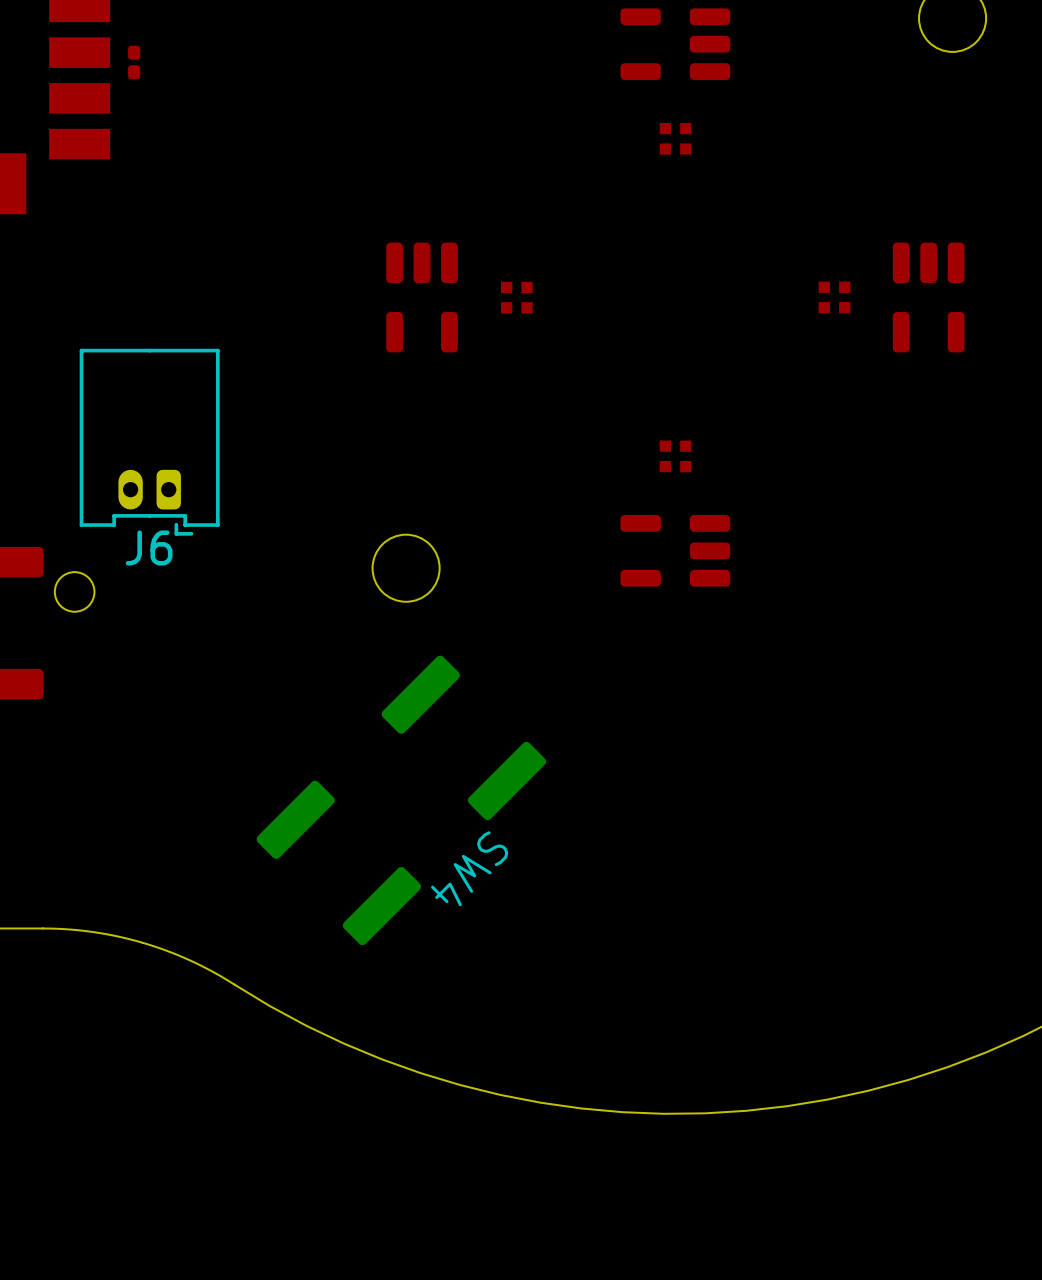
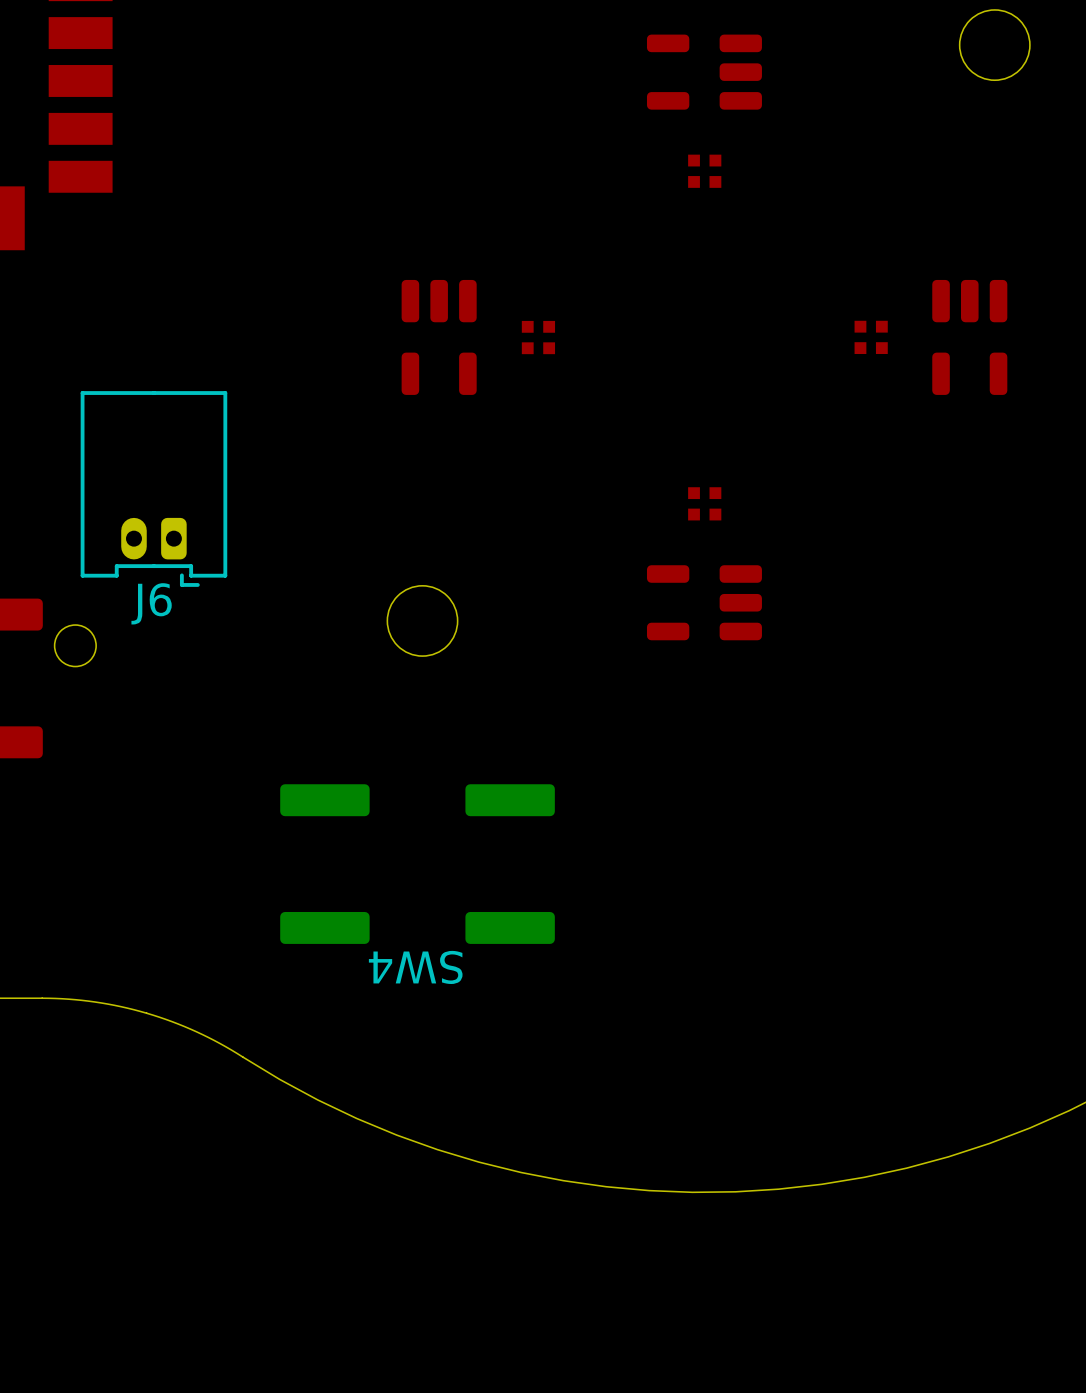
part: (134, 62) -> none
SW4 rotation: 0° (401, 800) -> 45° clockwise (417, 864)

